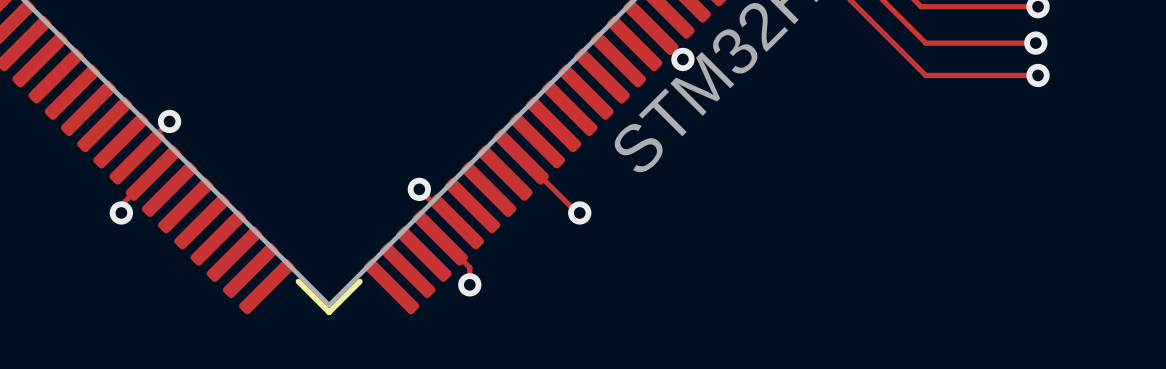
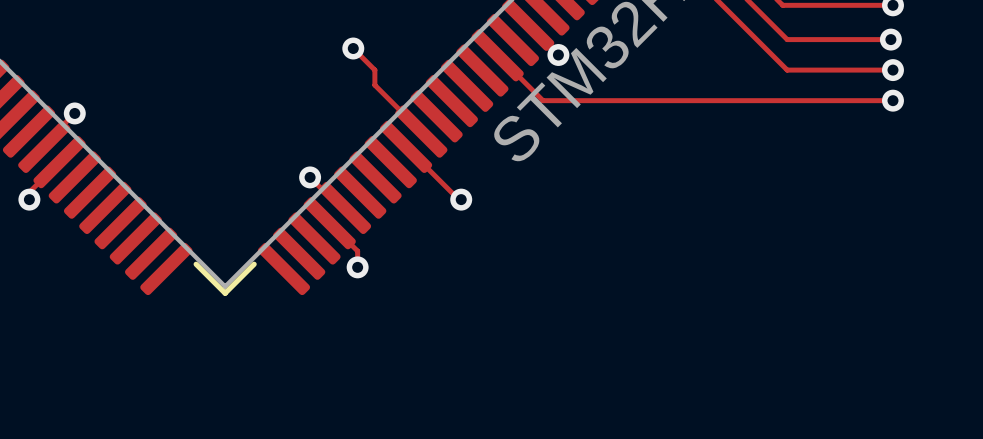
top track: none -> (353, 48) (374, 70) (374, 85) (421, 131)
via: none -> (353, 48)
top track: none -> (497, 55) (543, 100) (892, 100)
via: none -> (892, 100)

